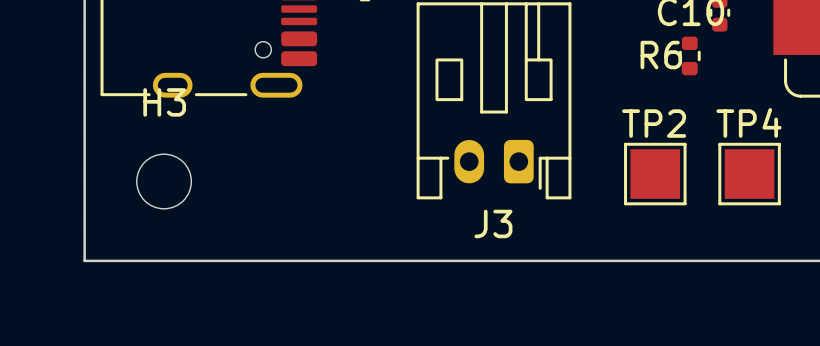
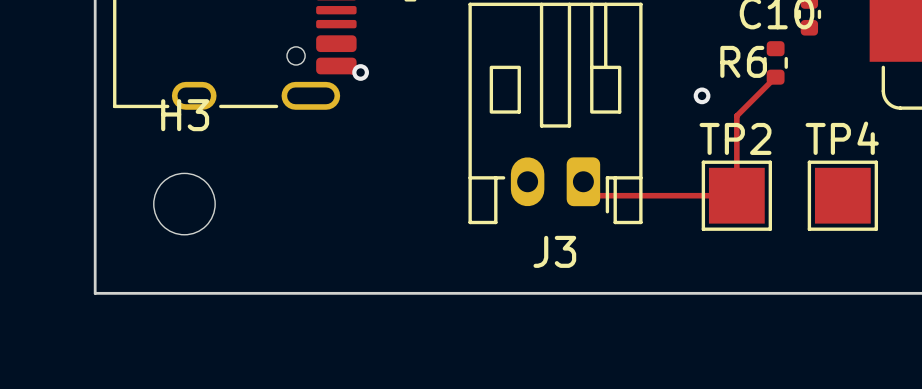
via: none -> (360, 72)
track: none -> (775, 77) (736, 115) (736, 195) (597, 195) (583, 181)
via: none -> (702, 95)

